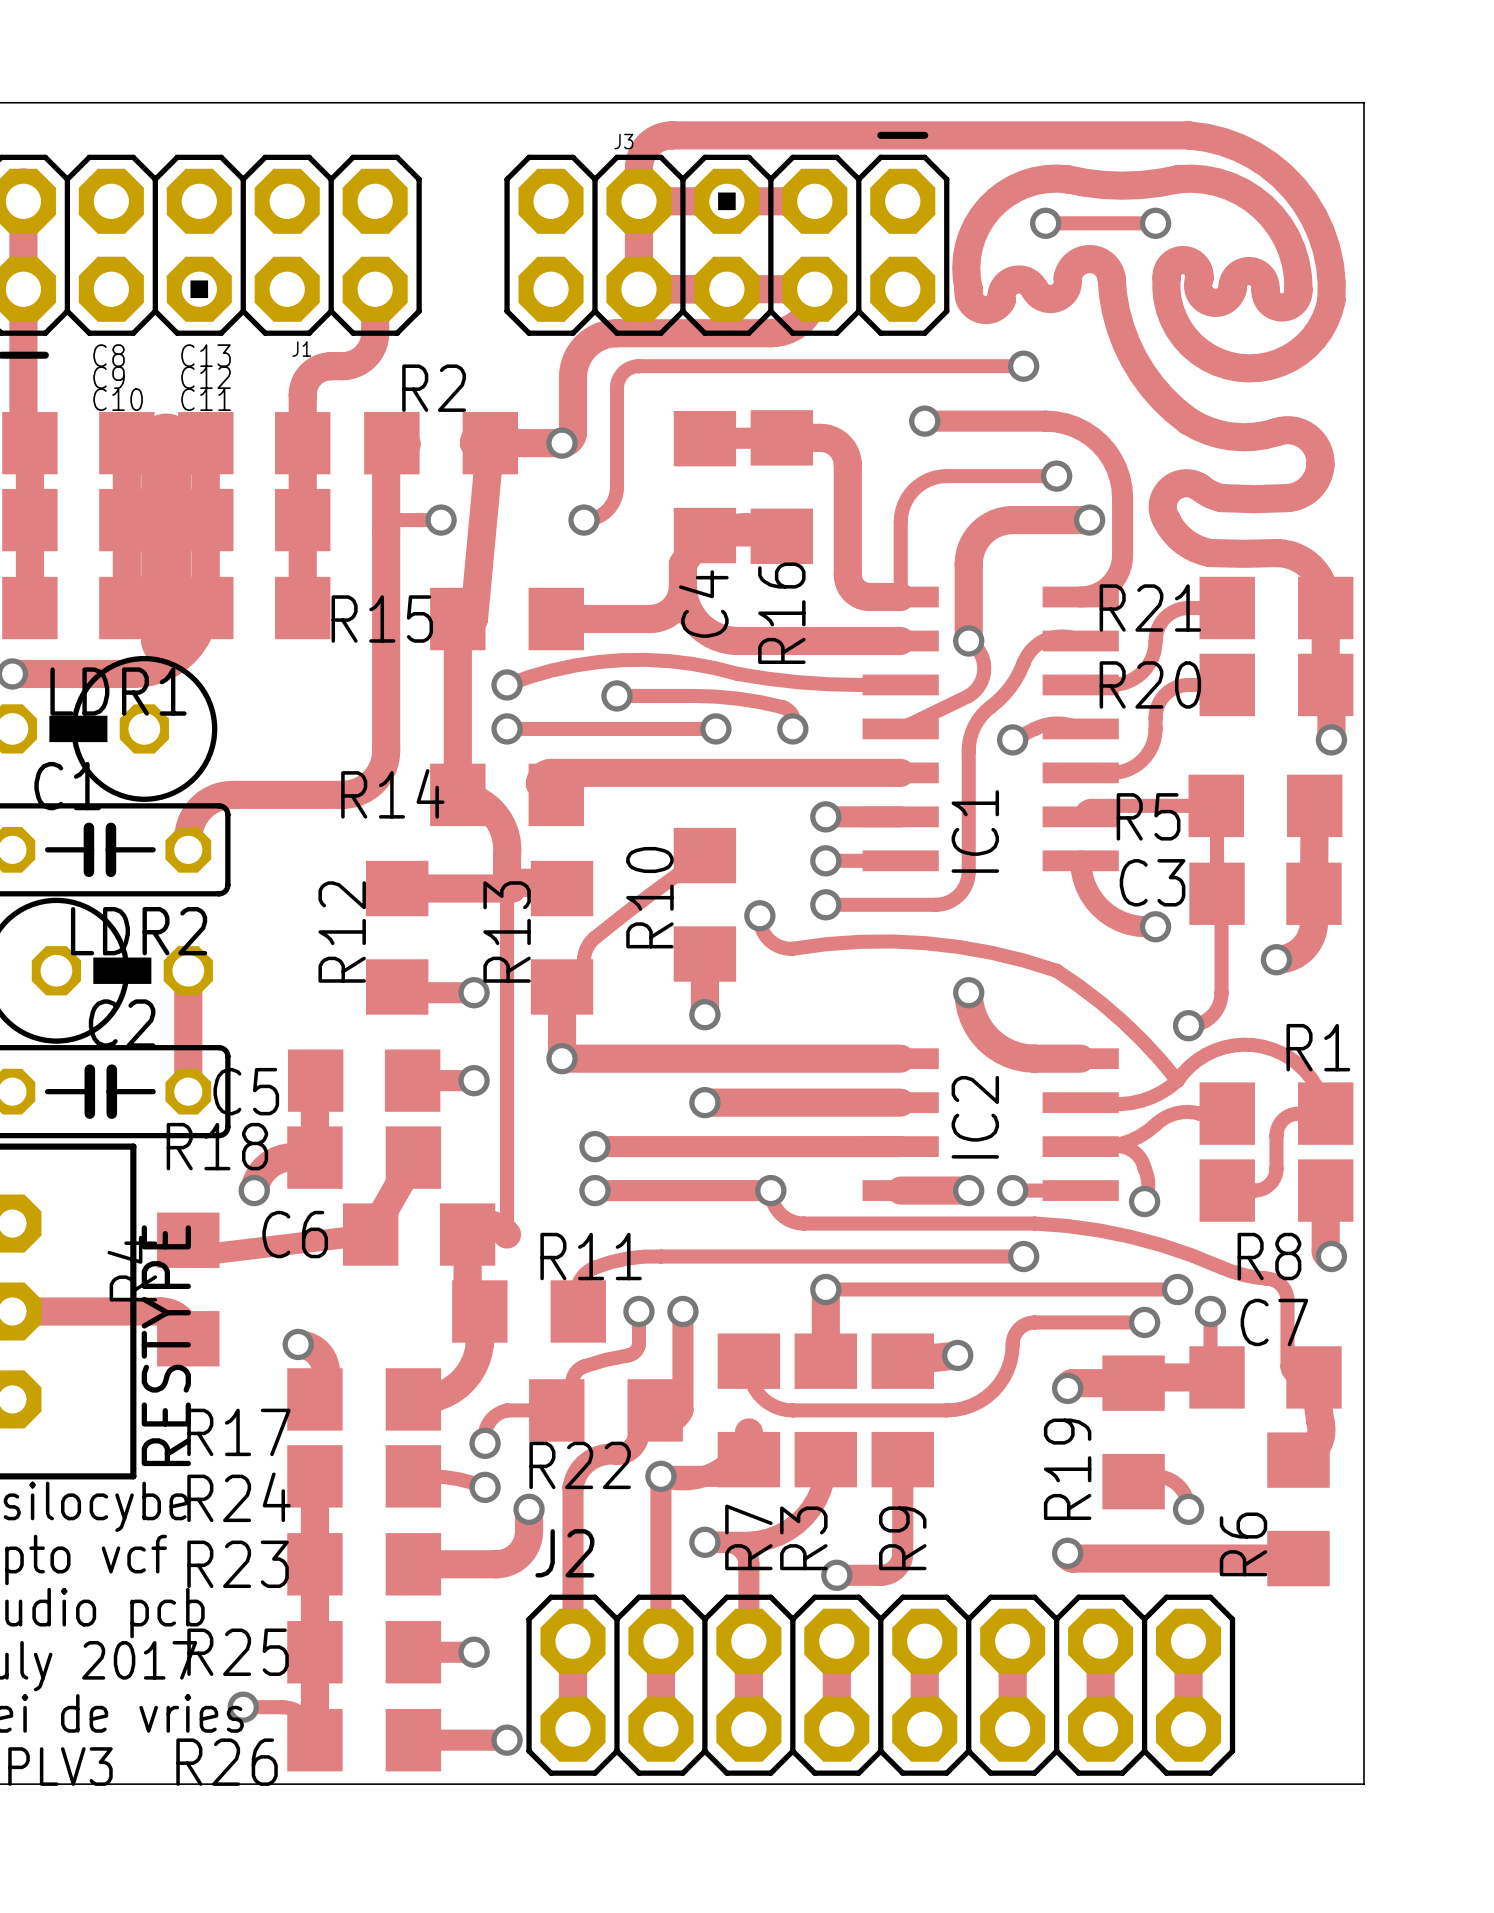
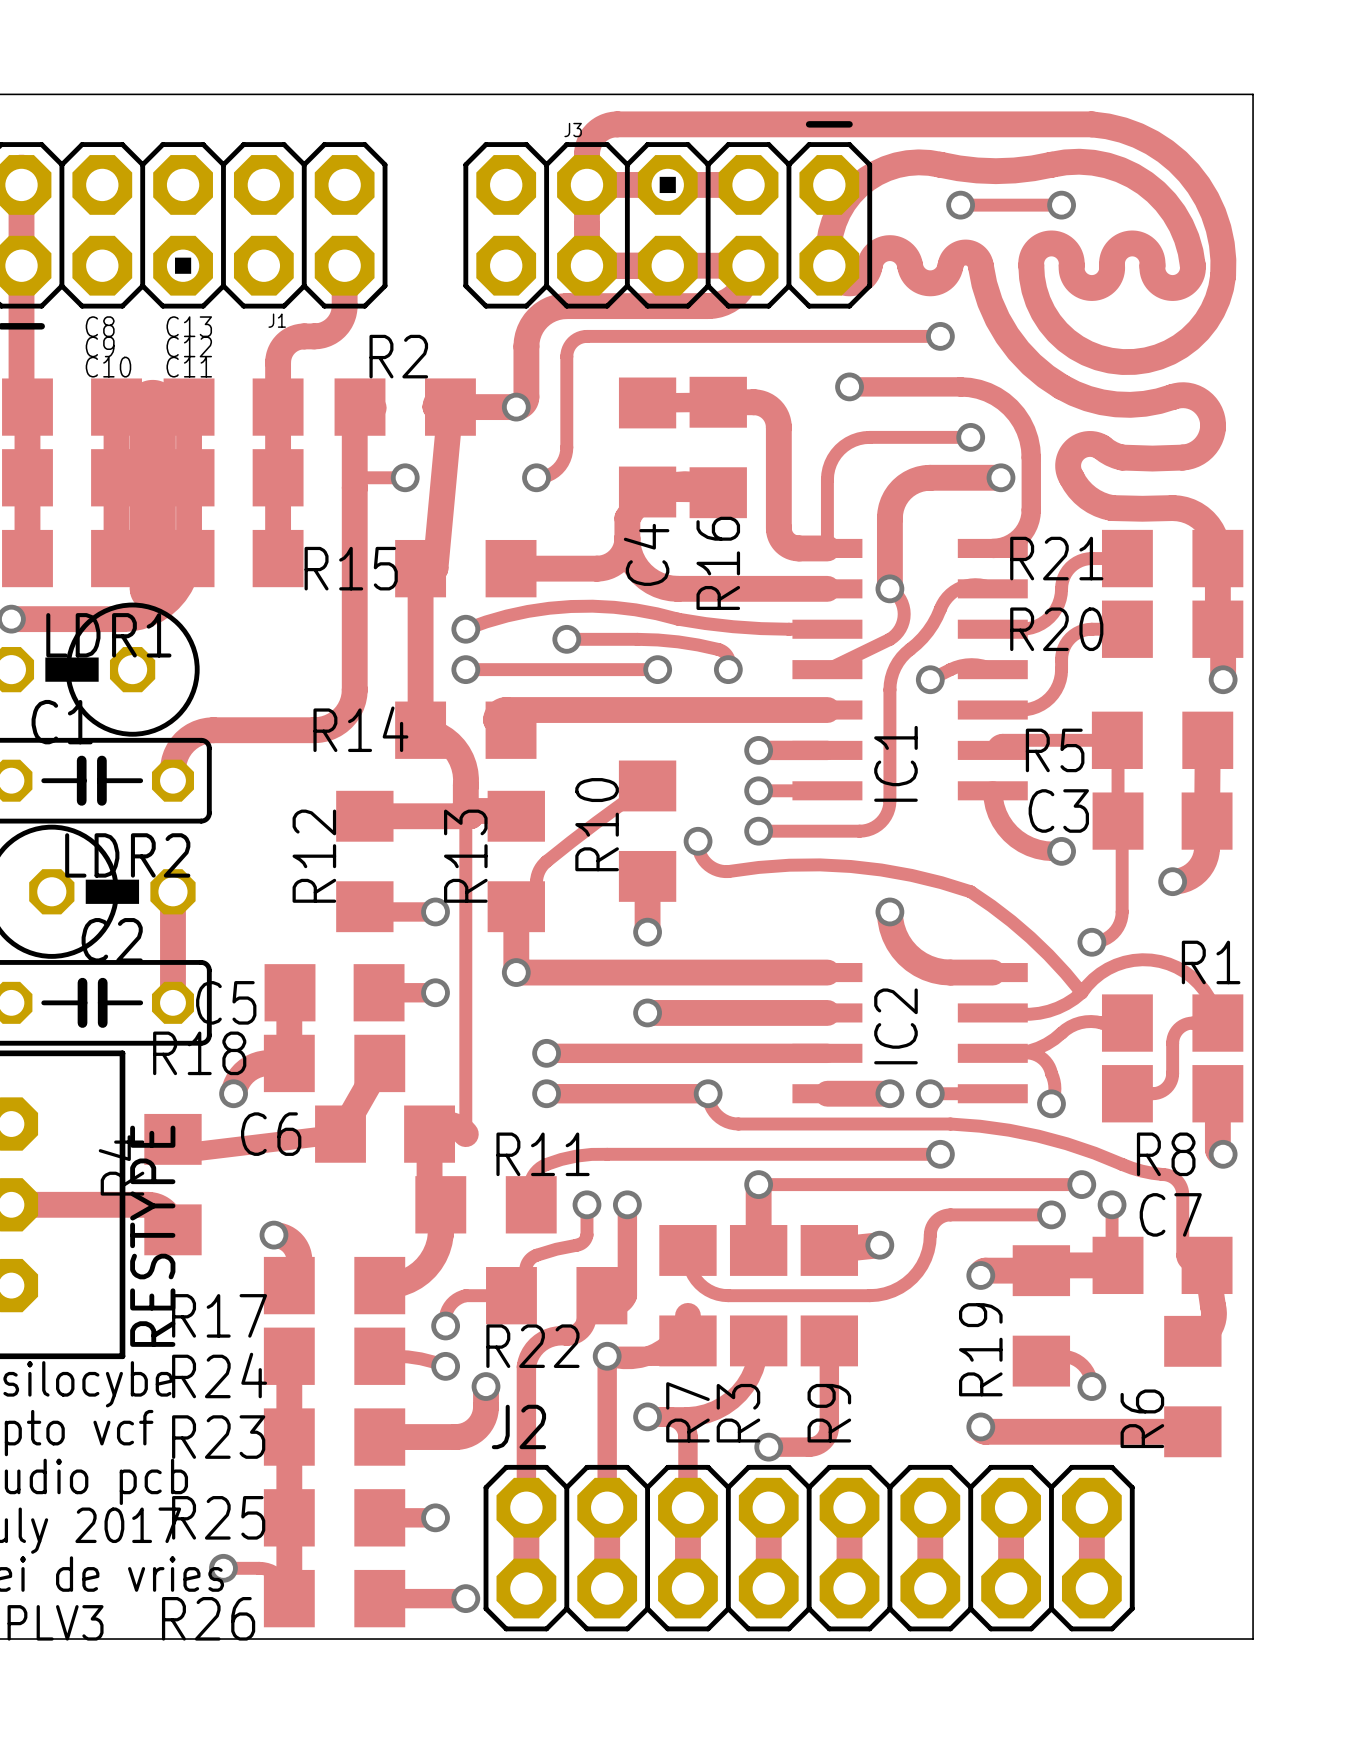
track: (1331, 300) (1325, 320) (1313, 338) (1289, 358) (1269, 365) (1249, 368) (1228, 365) (1208, 357) (1191, 345) (1173, 319) (1167, 299) (1166, 274) (1170, 266) (1174, 262) (1185, 260) (1194, 264) (1199, 274) (1198, 287) (1199, 293) (1204, 298) (1212, 302) (1220, 301) (1226, 298) (1231, 291) (1236, 277) (1246, 271) (1255, 272) (1261, 277) (1264, 282) (1266, 297) (1275, 306) (1284, 307) (1290, 305) (1296, 299) (1298, 291) (1297, 276) (1292, 250) (1286, 238) (1272, 216) (1252, 198) (1241, 191) (1216, 182) (1203, 179) (1177, 179) (1122, 185) (1056, 178) (1035, 181) (1014, 188) (997, 200) (982, 216) (972, 235) (966, 256) (966, 278) (969, 298) (976, 307) (987, 310) (995, 307) (1001, 300) (1001, 293) (1005, 285) (1017, 279) (1028, 282) (1042, 297) (1055, 298) (1066, 289) (1068, 275) (1073, 265) (1086, 259) (1098, 260) (1107, 267) (1111, 275) (1116, 311) (1126, 343) (1142, 372) (1163, 399) (1188, 421) (1220, 434) (1242, 437) (1276, 432) -> (1223, 275) (1217, 299) (1212, 310) (1206, 321) (1190, 339) (1169, 352) (1158, 357) (1134, 361) (1110, 360) (1098, 357) (1076, 347) (1057, 332) (1049, 322) (1043, 312) (1034, 289) (1031, 260) (1034, 253) (1041, 246) (1051, 243) (1059, 244) (1070, 255) (1072, 273) (1075, 280) (1084, 286) (1094, 287) (1104, 283) (1109, 278) (1112, 257) (1118, 249) (1127, 244) (1134, 243) (1144, 247) (1149, 253) (1153, 273) (1160, 283) (1172, 288) (1184, 283) (1191, 275) (1192, 265) (1190, 251) (1181, 225) (1165, 202) (1145, 183) (1133, 175) (1107, 165) (1079, 161) (995, 171) (958, 168) (929, 162) (907, 163) (886, 168) (866, 179) (843, 202) (833, 222) (829, 243) (829, 265) (833, 275) (839, 280) (852, 283) (861, 279) (867, 273) (873, 256) (884, 248) (895, 248) (902, 252) (907, 258) (915, 277) (922, 281) (930, 283) (938, 281) (944, 277) (956, 255) (963, 252) (971, 253) (979, 261) (990, 302) (1007, 335) (1018, 350) (1045, 376) (1074, 393) (1101, 402) (1115, 404) (1144, 403) (1172, 396)

